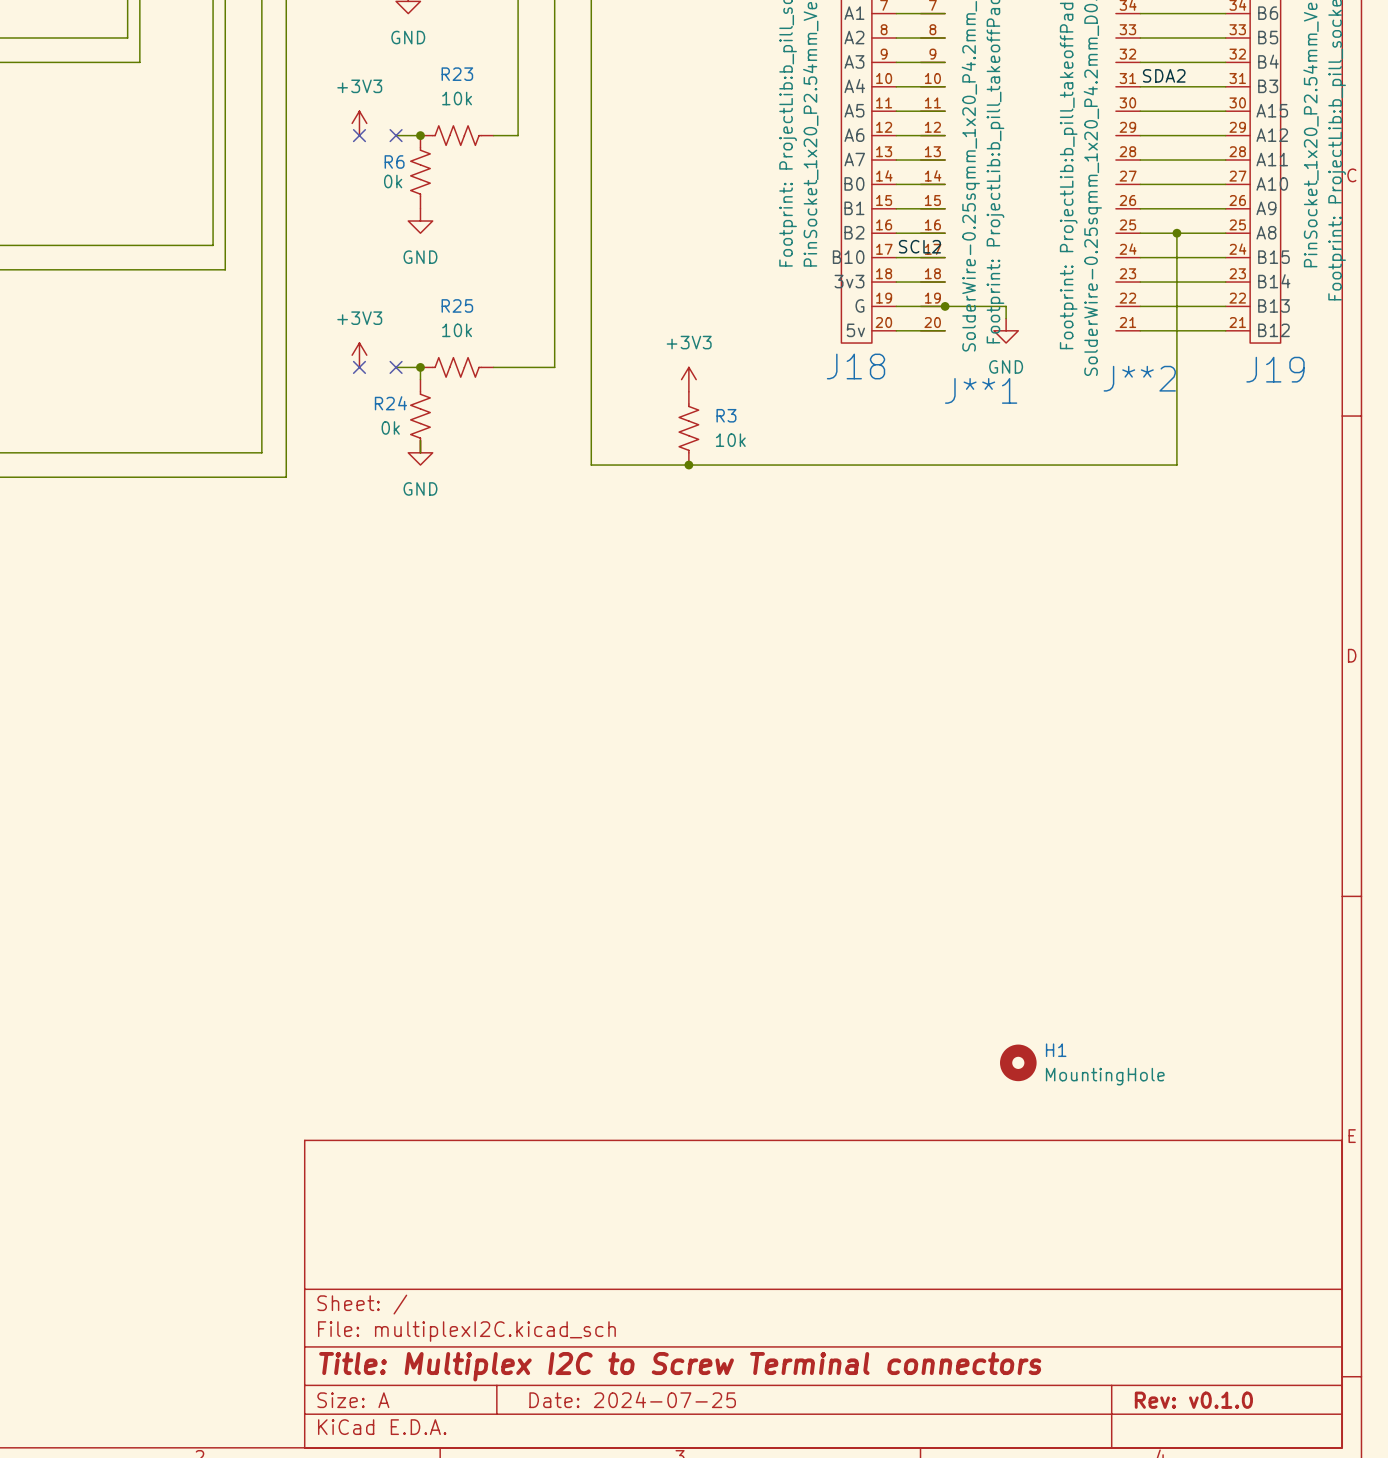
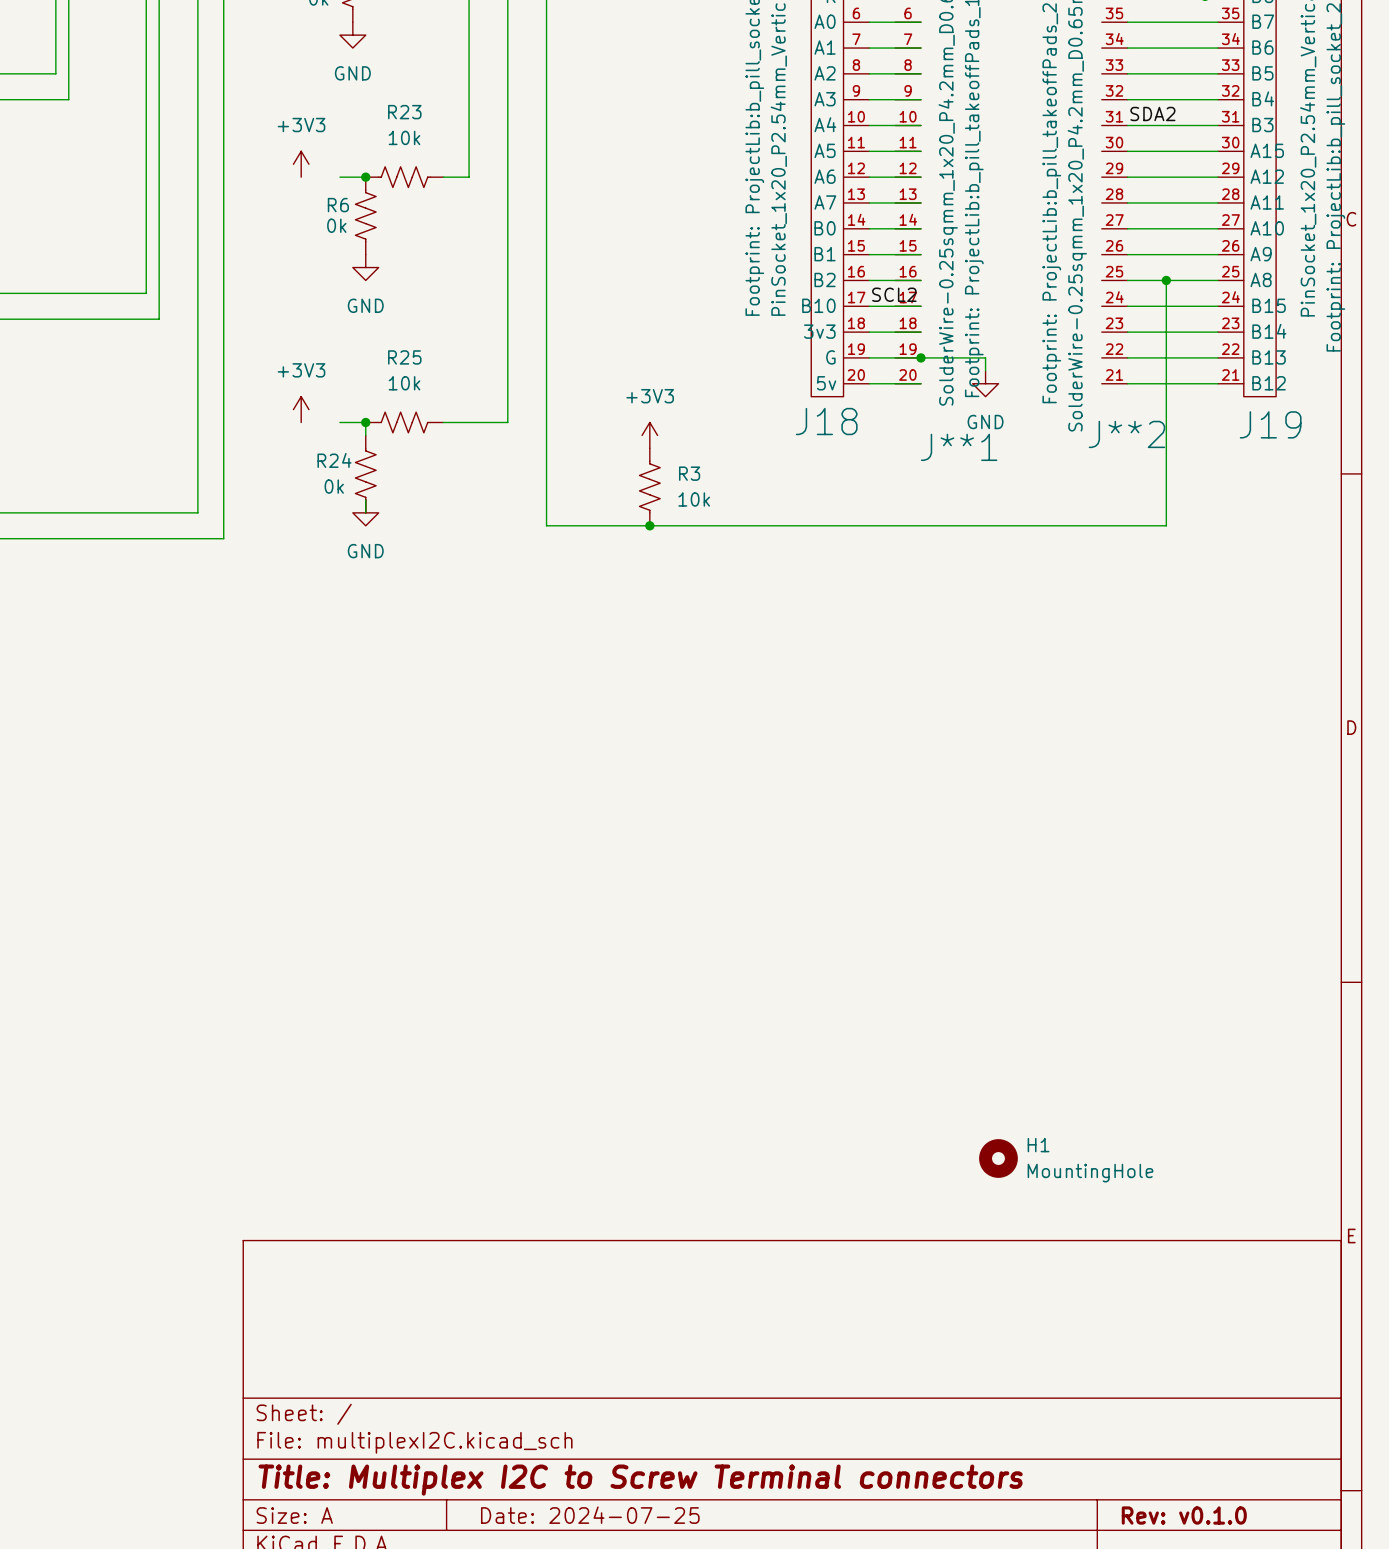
no-connect mark: (359, 135) -> none
no-connect mark: (396, 135) -> none
no-connect mark: (359, 367) -> none
no-connect mark: (396, 367) -> none

